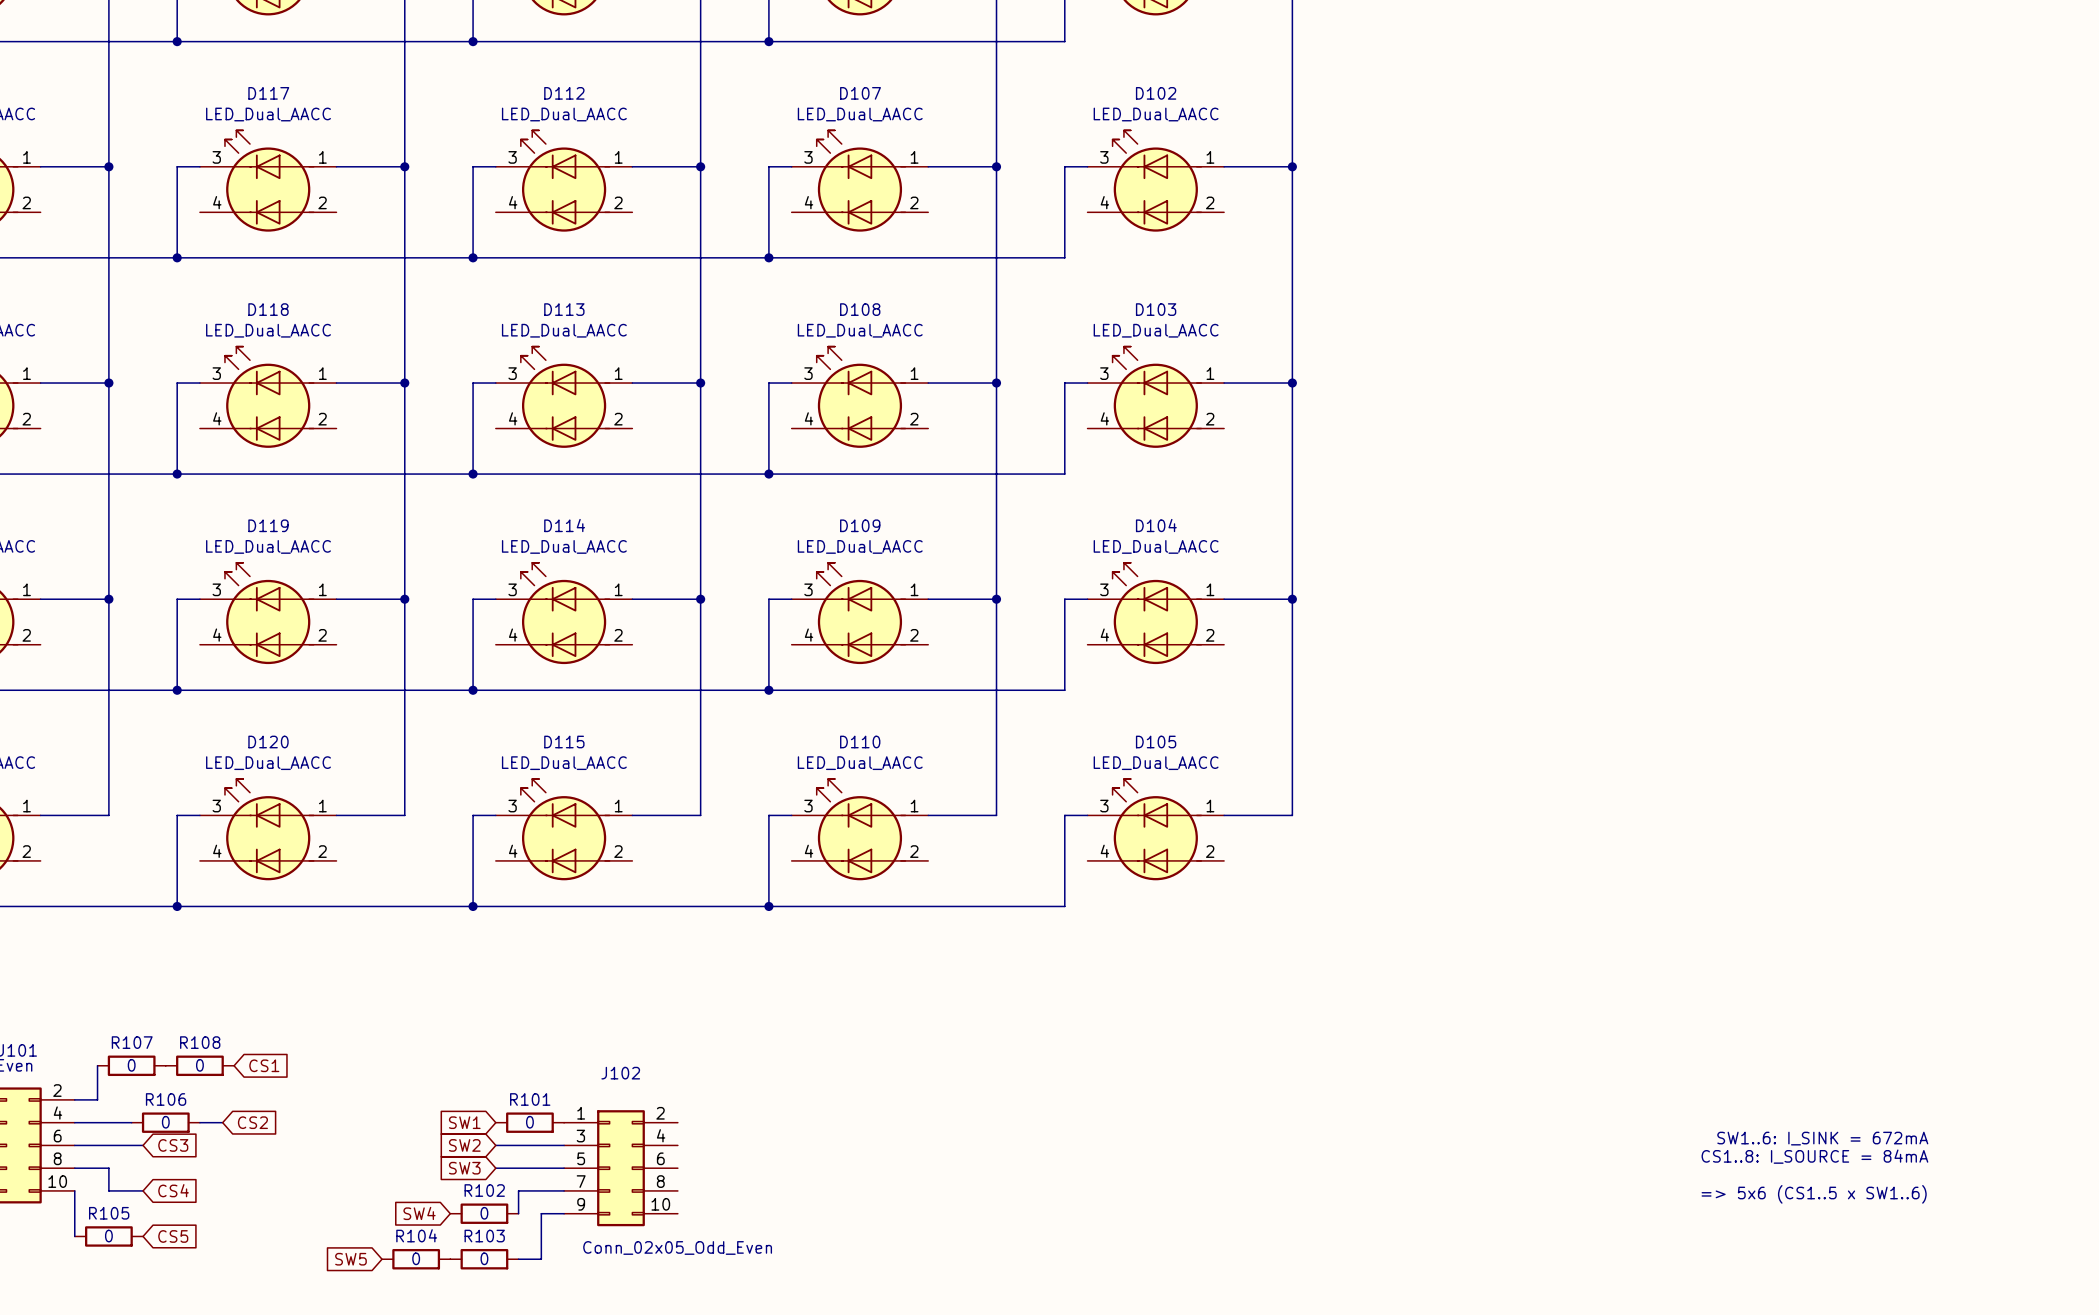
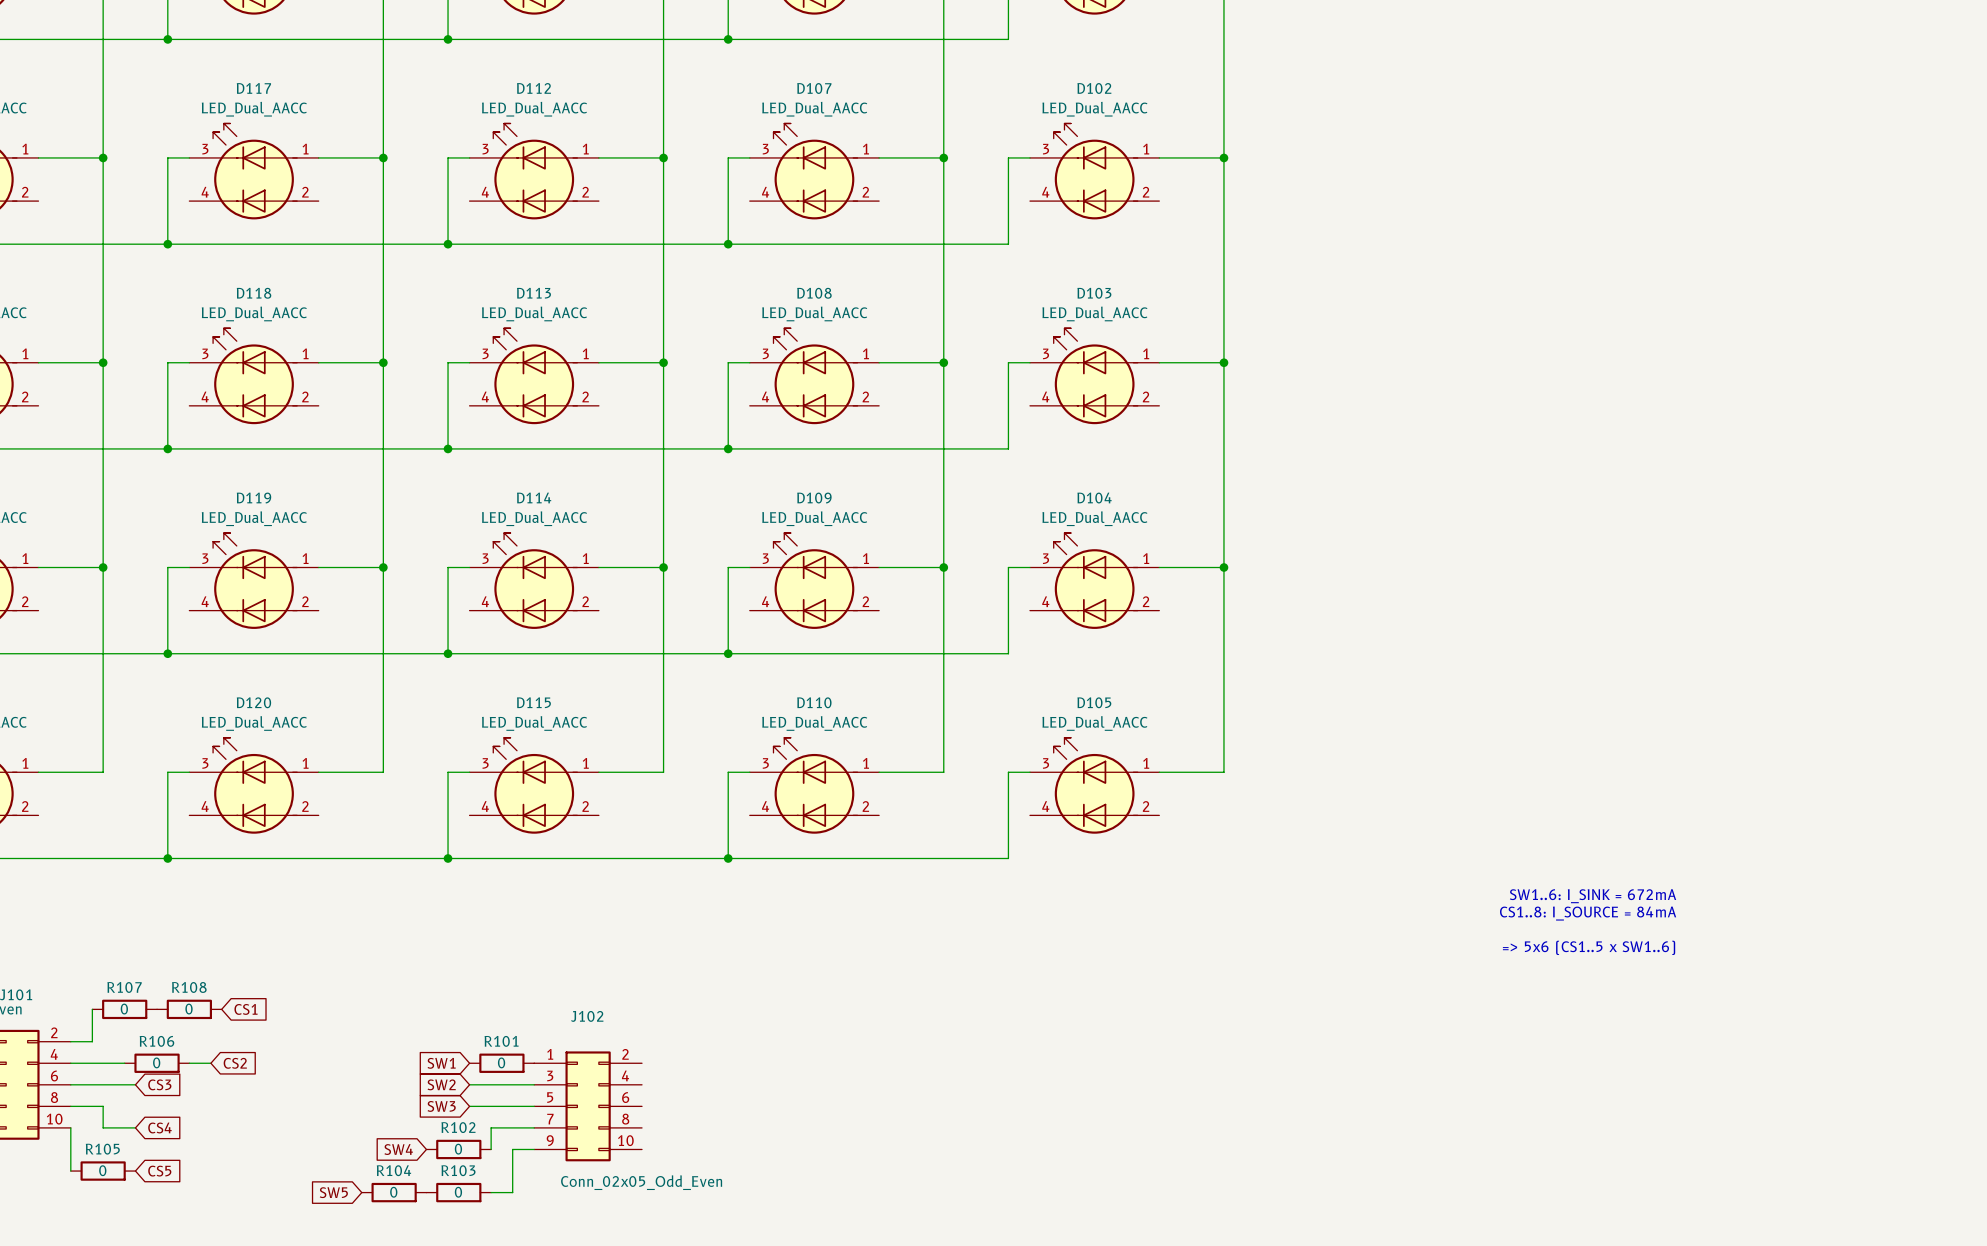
text: none -> SW1..6: I_SINK = 672mA (1593, 896)
text: none -> CS1..8: I_SOURCE = 84mA (1588, 913)
text: none -> => 5x6 (CS1..5 x SW1..6) (1589, 947)
text: SW1..6: I_SINK = 672mA (1822, 1138) -> none
text: CS1..8: I_SOURCE = 84mA (1814, 1156) -> none
text: => 5x6 (CS1..5 x SW1..6) (1814, 1194) -> none

